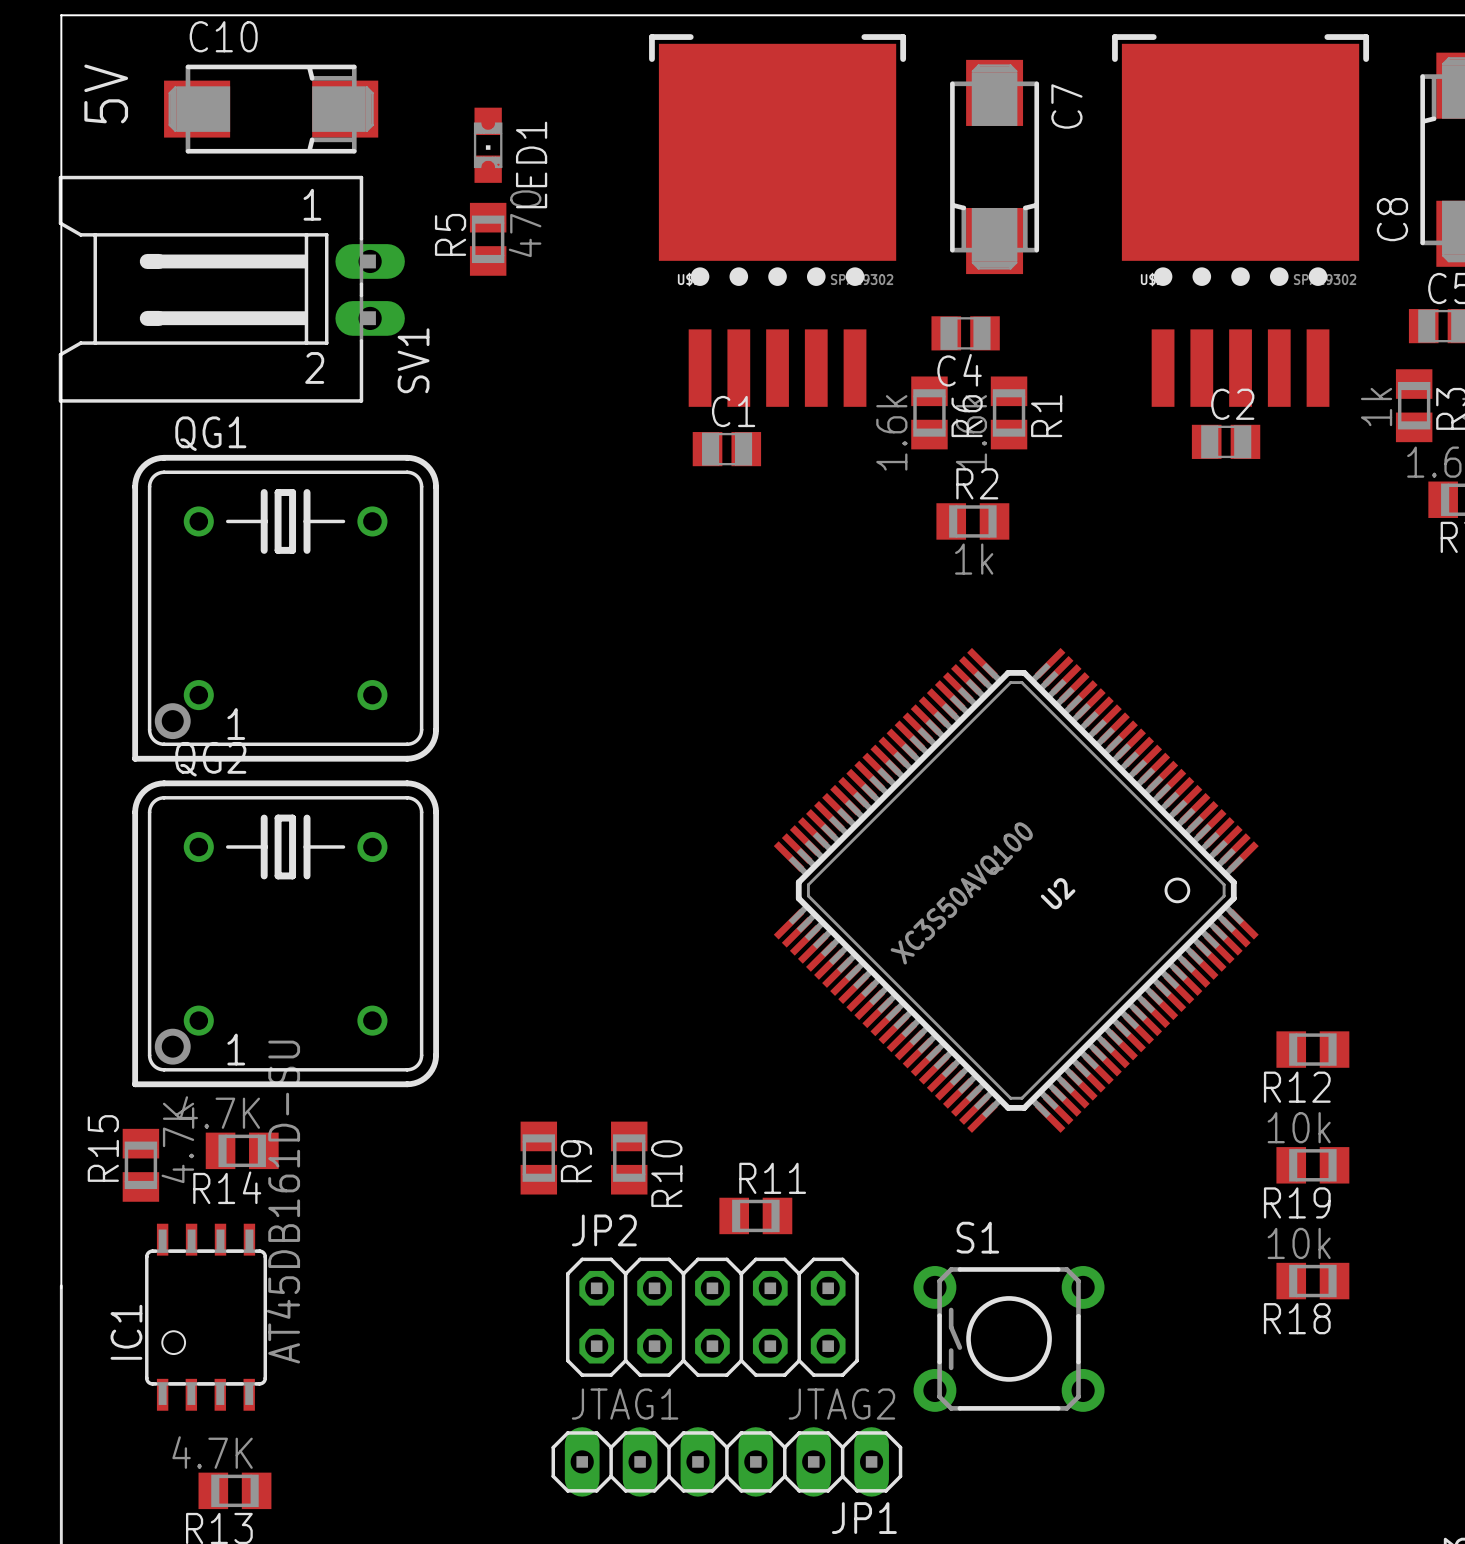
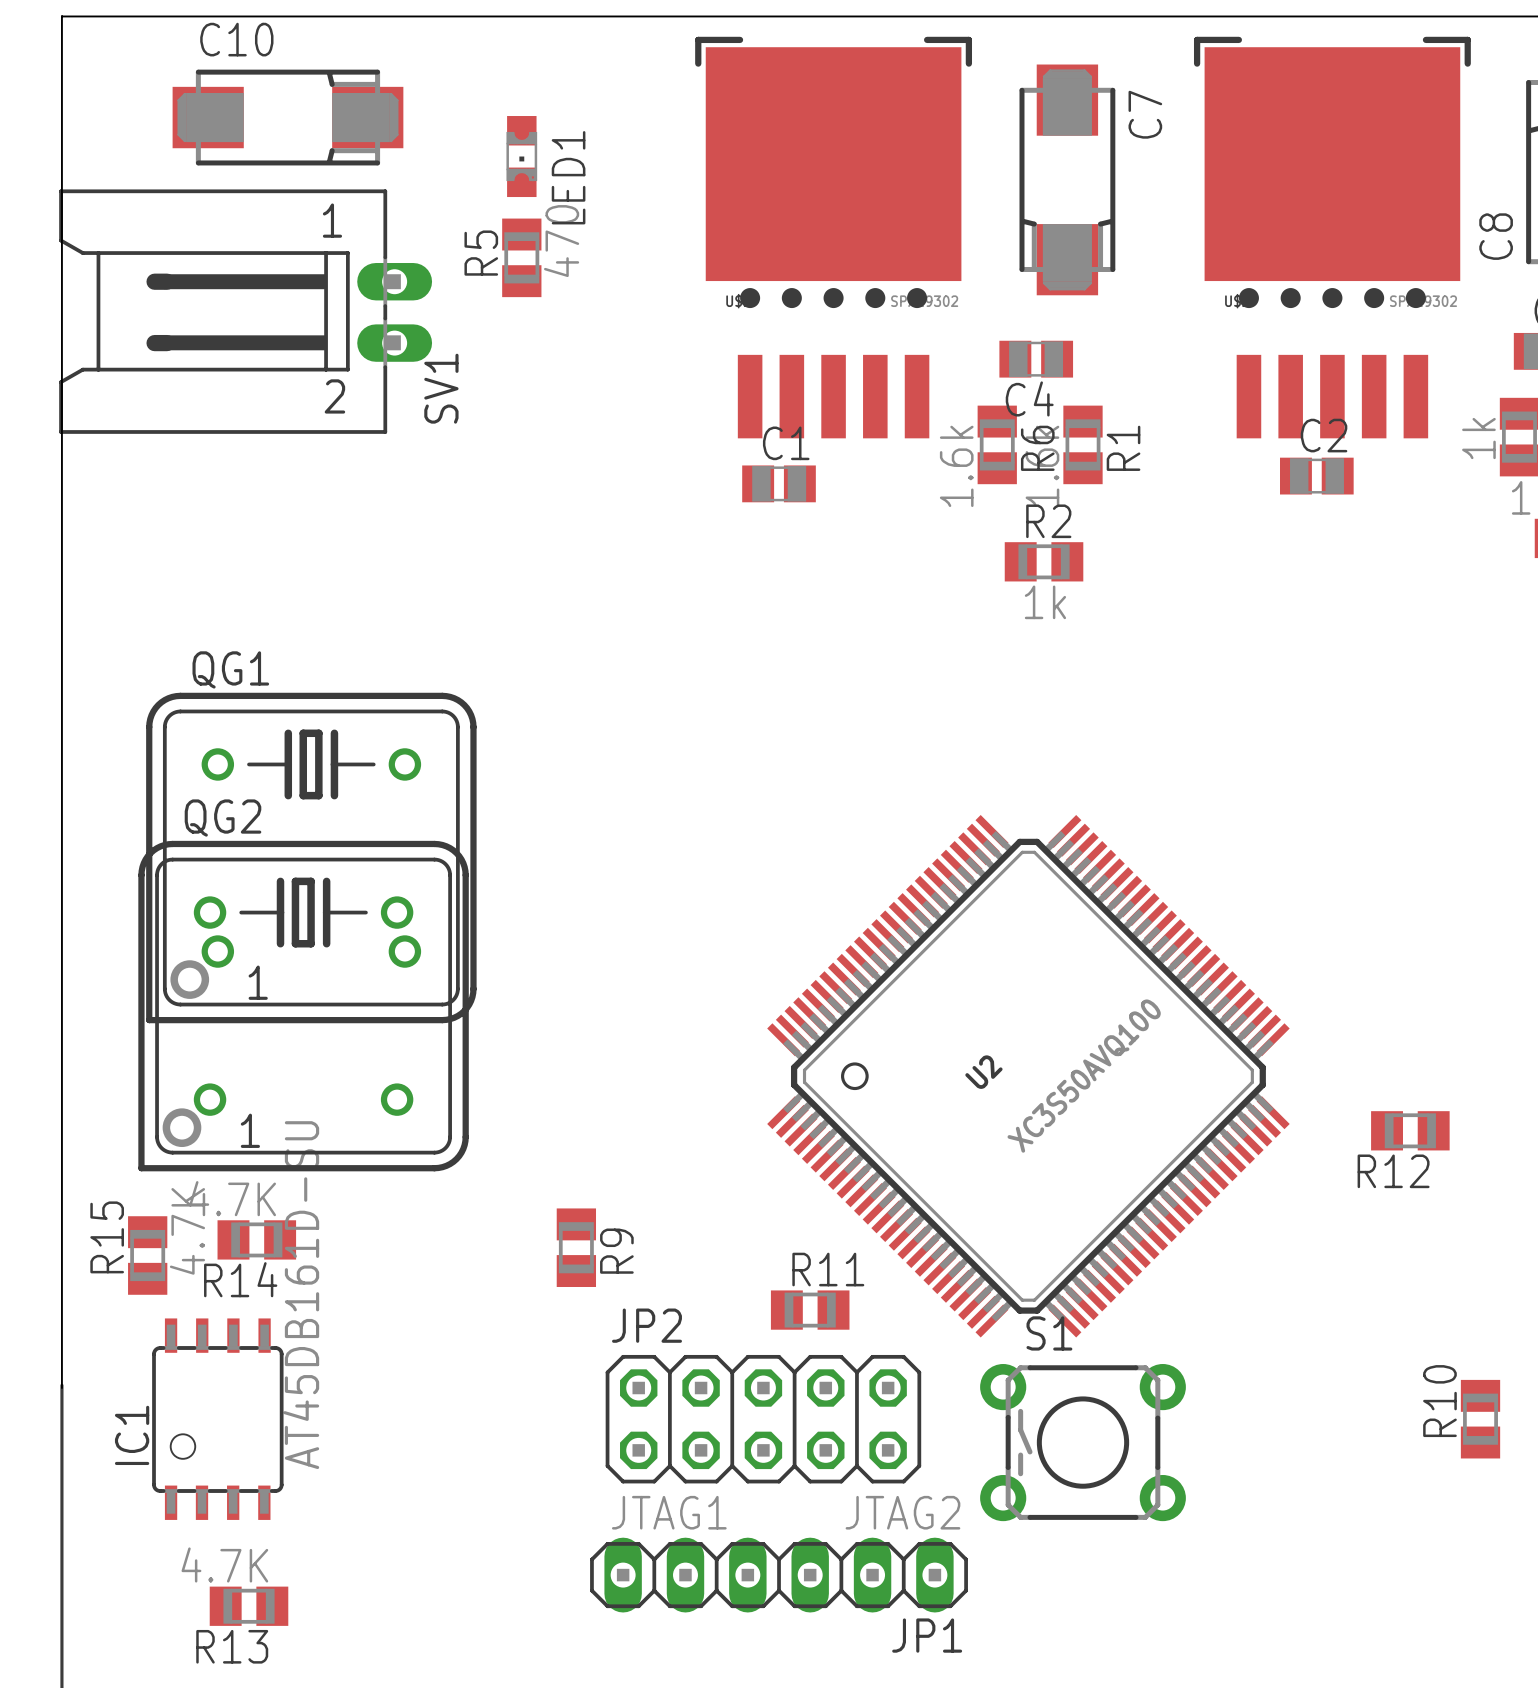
text: 5V (106, 93) -> none
QG1 position: (285, 608) -> (311, 858)
U2 rotation: 0° (1016, 890) -> 180° (1028, 1076)
R10 position: (629, 1158) -> (1480, 1419)
R19: 10k (1312, 1165) -> none
R10 name position: R10 (666, 1173) -> R10 (1439, 1401)
R18: 10k (1312, 1281) -> none

